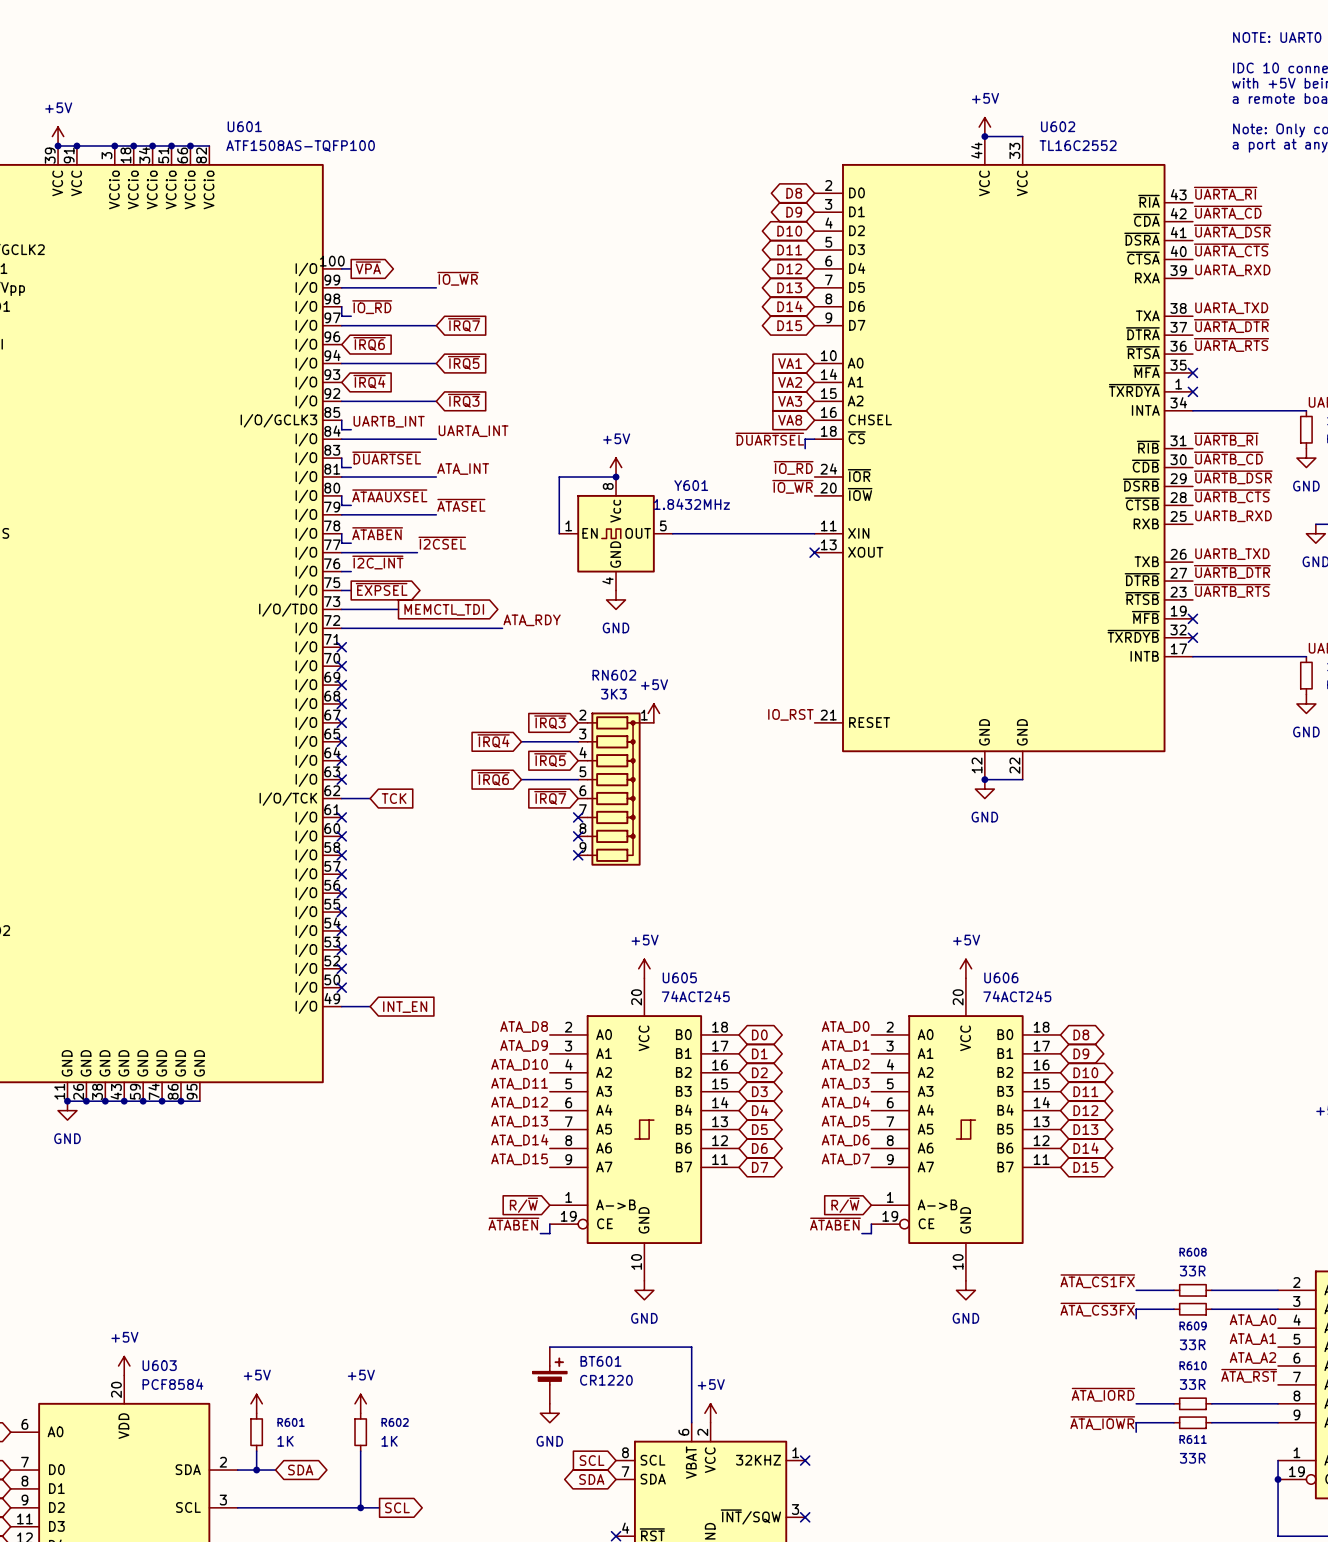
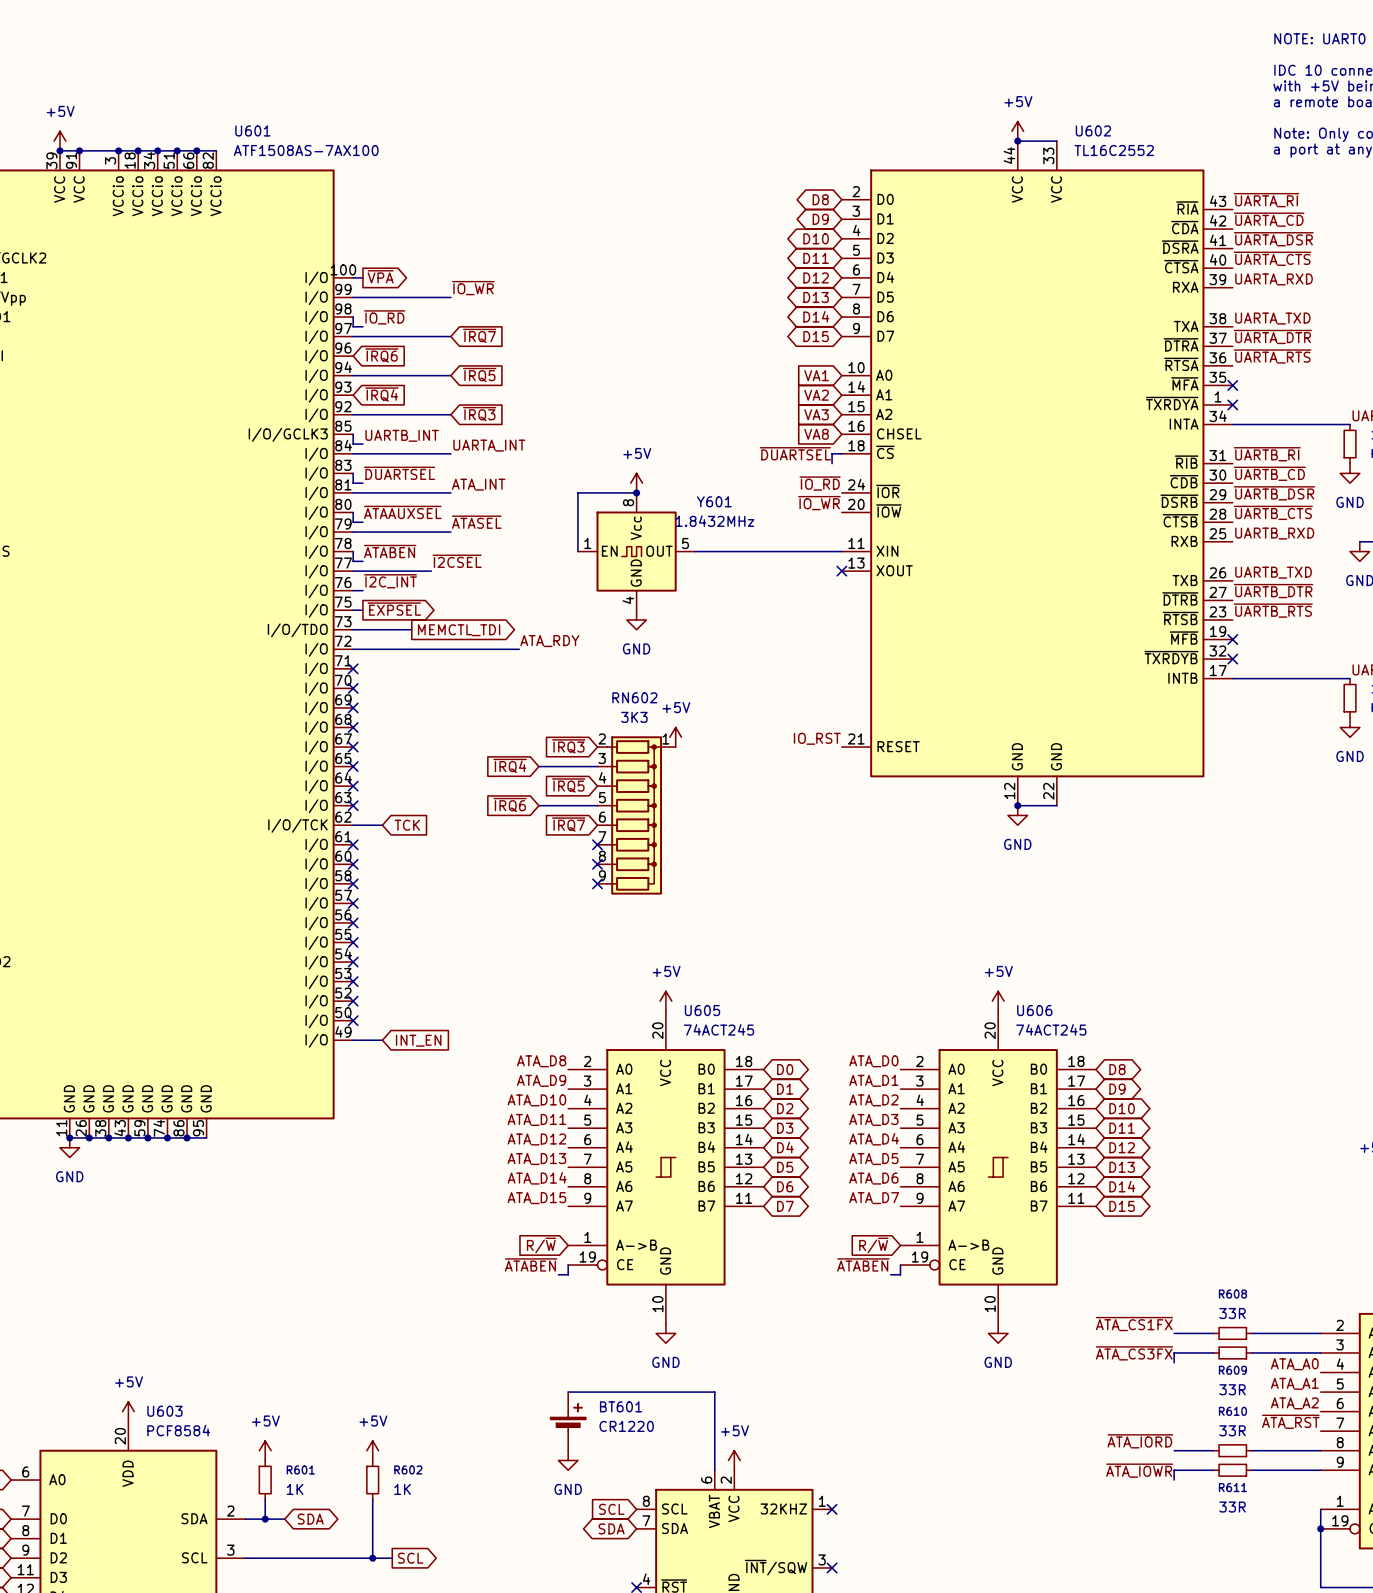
U601 value: ATF1508AS-TQFP100 (300, 146) -> ATF1508AS-7AX100 (306, 150)

